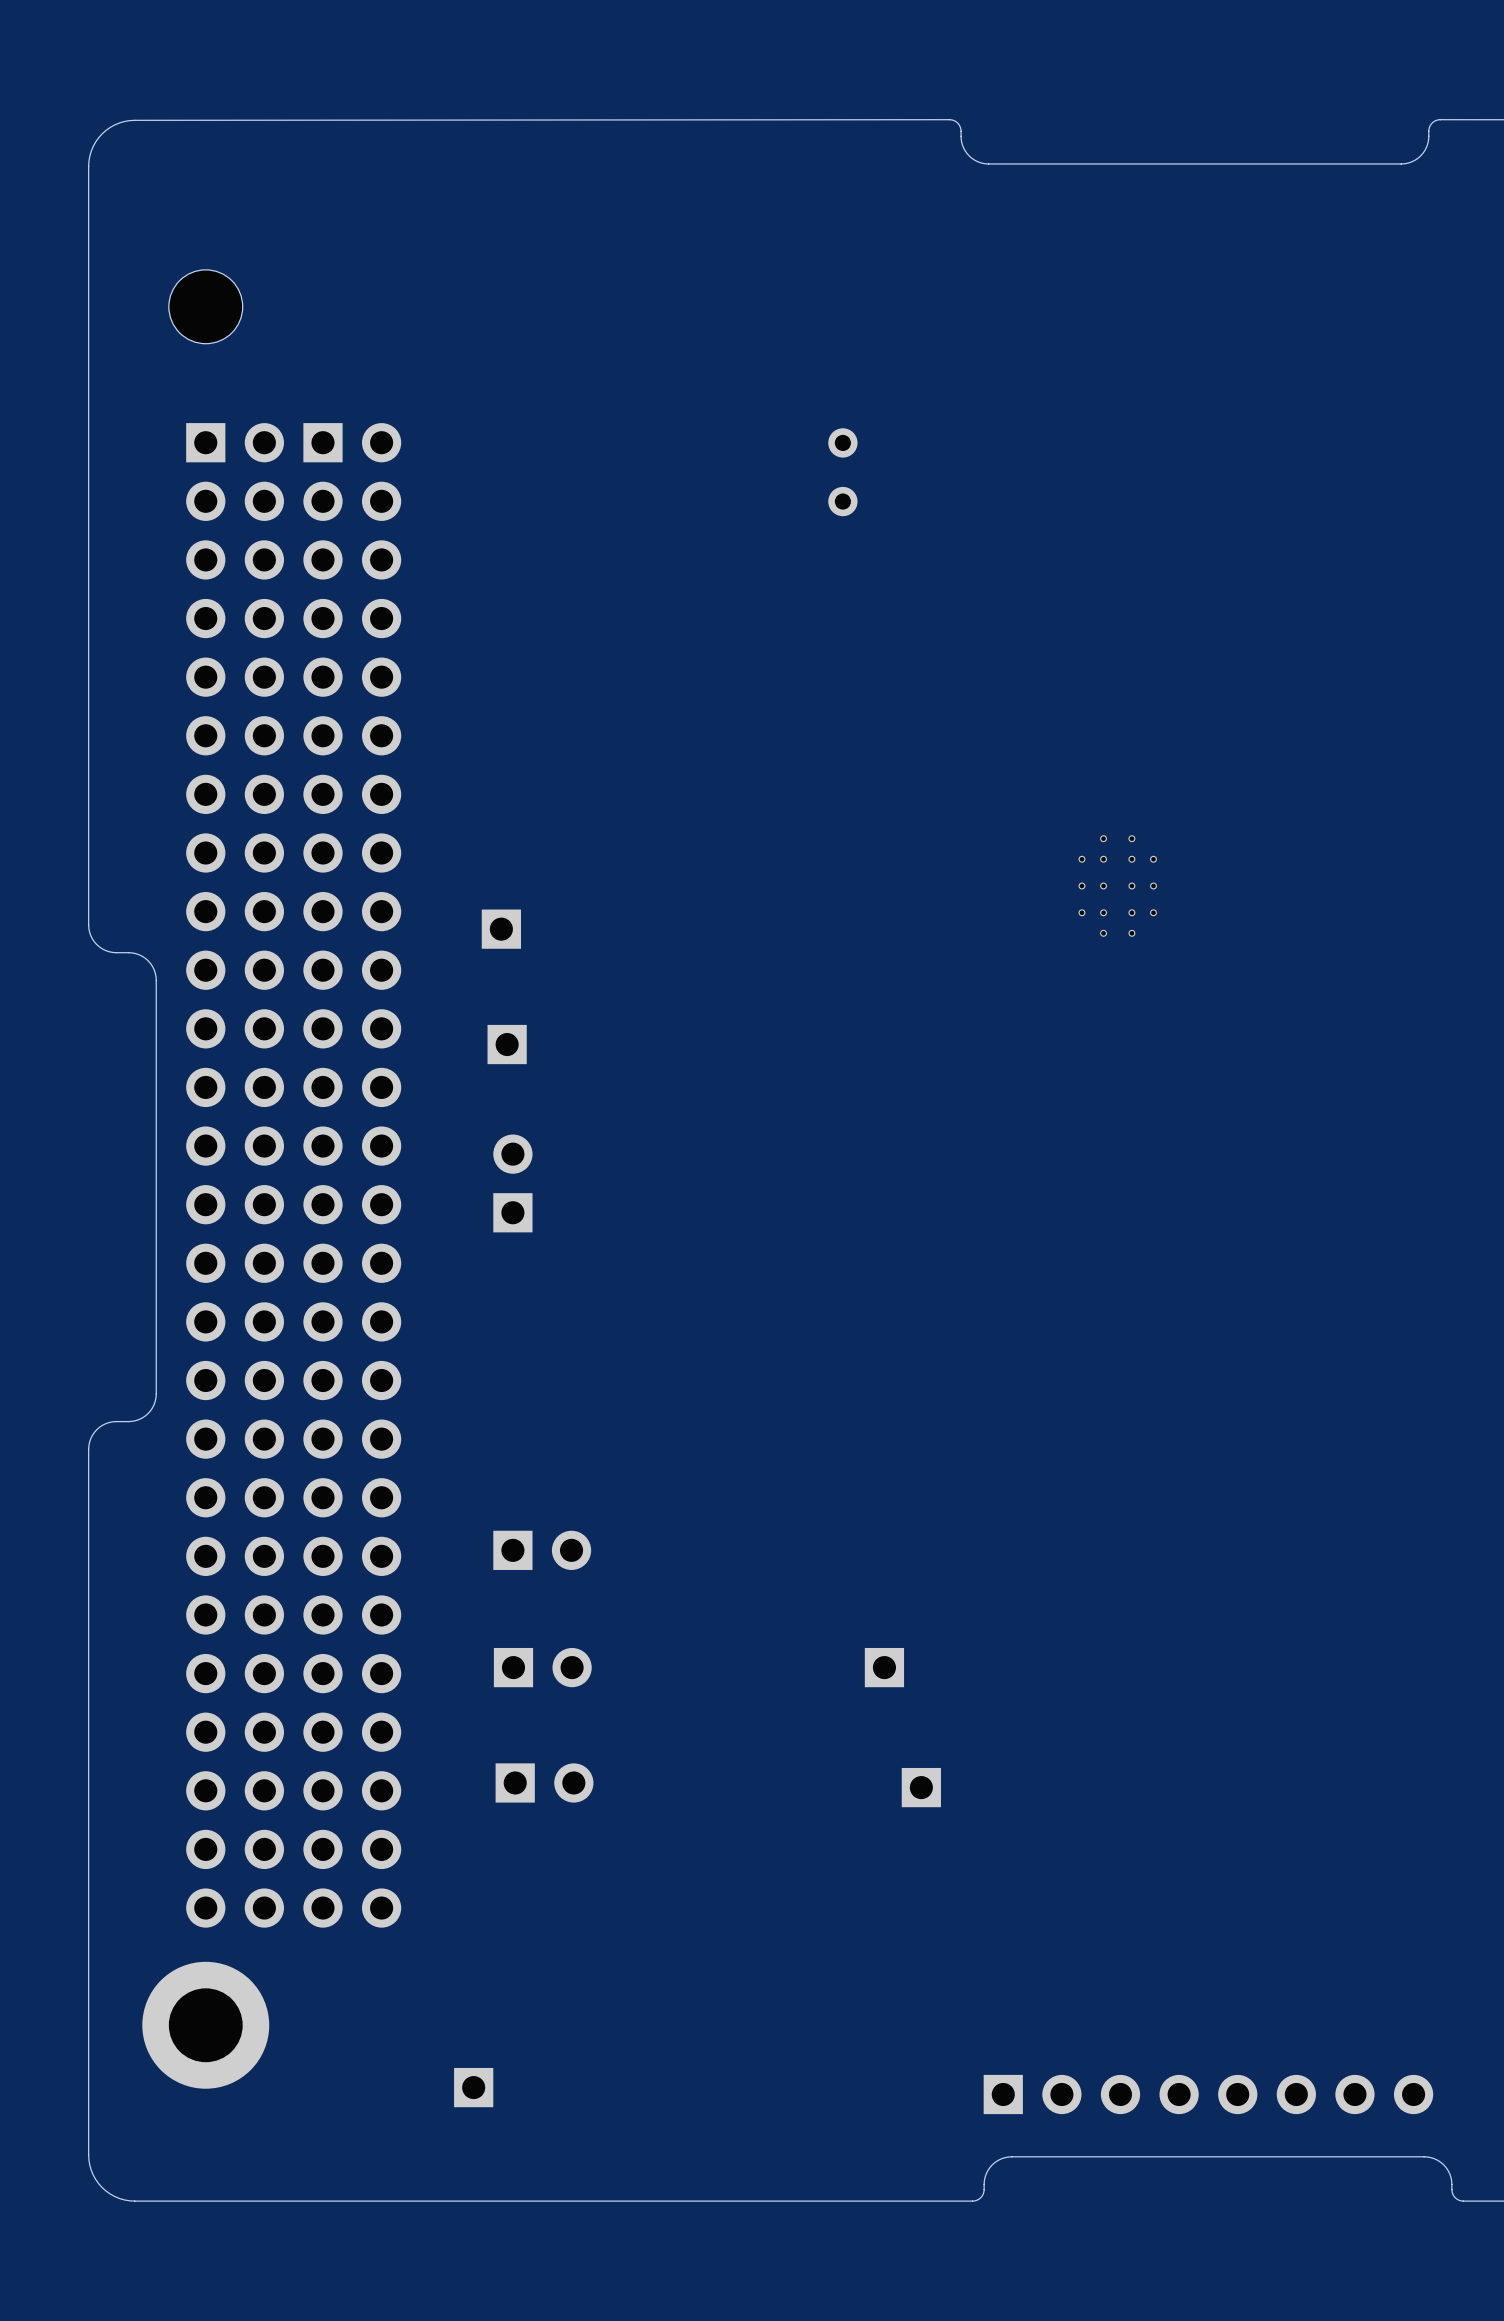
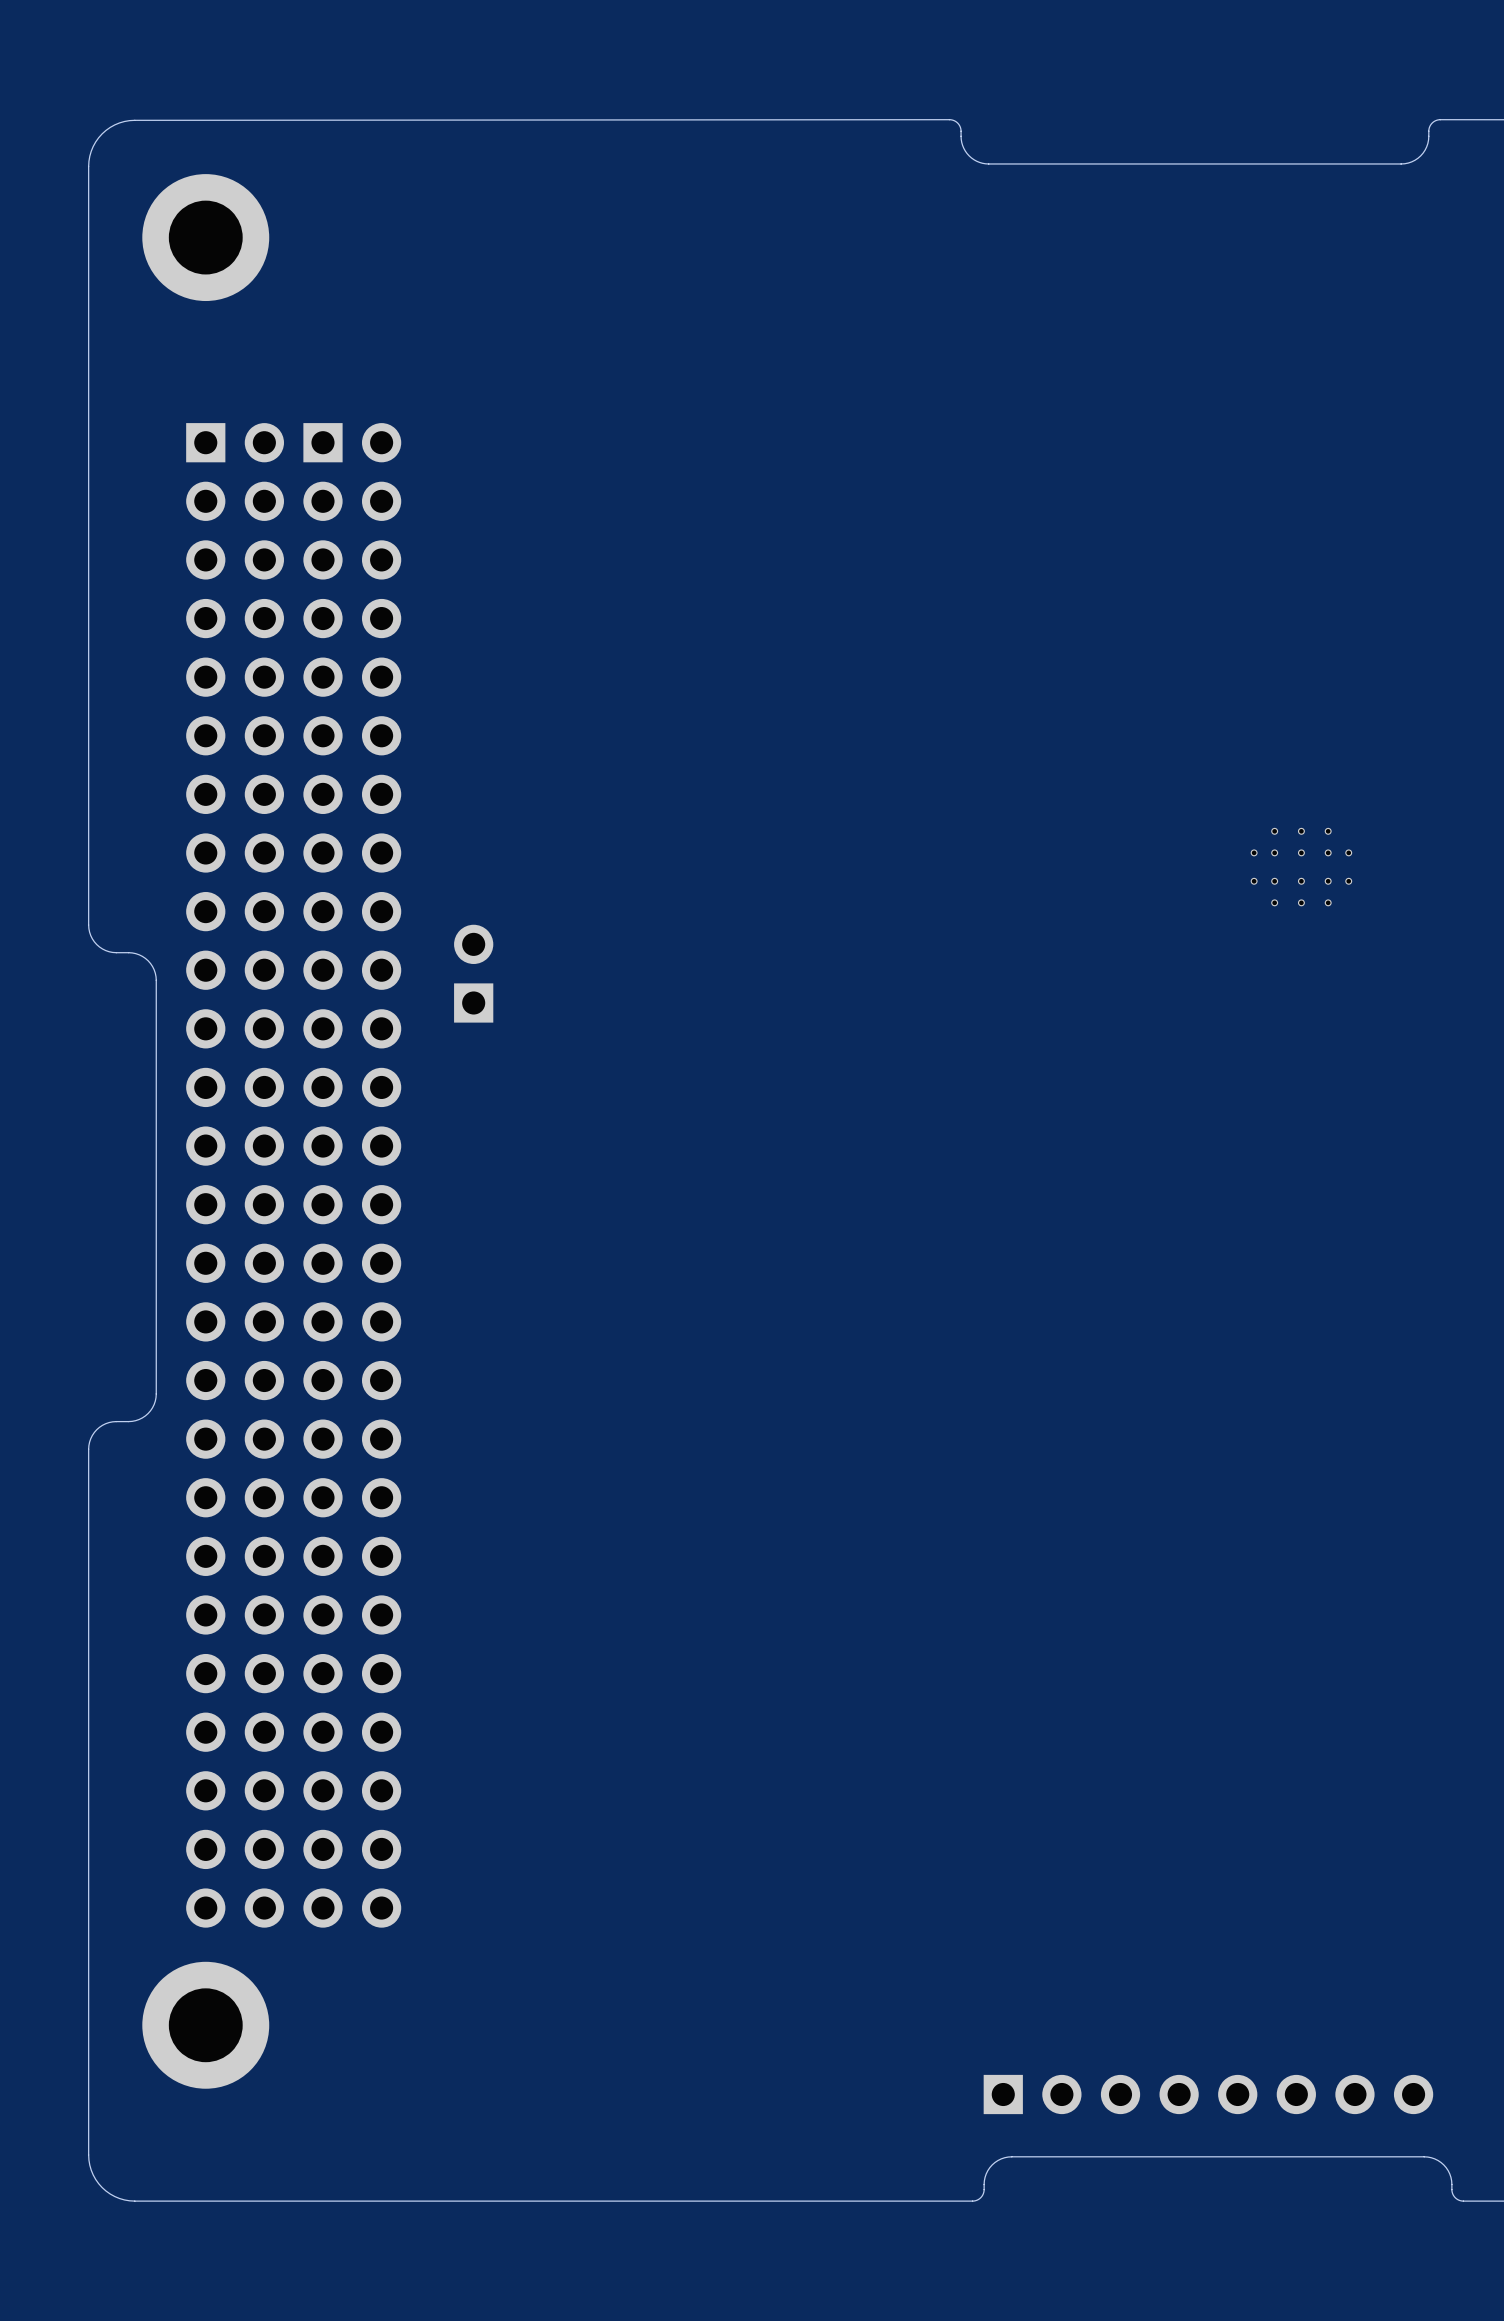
part: none -> (205, 237)
part: (205, 306) -> none
part: (842, 472) -> none
part rotation: 0° (1117, 886) -> 90° clockwise (1301, 867)
part position: (1117, 886) -> (1301, 867)
part: (501, 929) -> none
part: (507, 1044) -> none
part position: (512, 1183) -> (473, 973)
part: (542, 1550) -> none
part: (542, 1667) -> none
part: (884, 1667) -> none
part: (544, 1782) -> none
part: (921, 1787) -> none
part: (473, 2087) -> none

